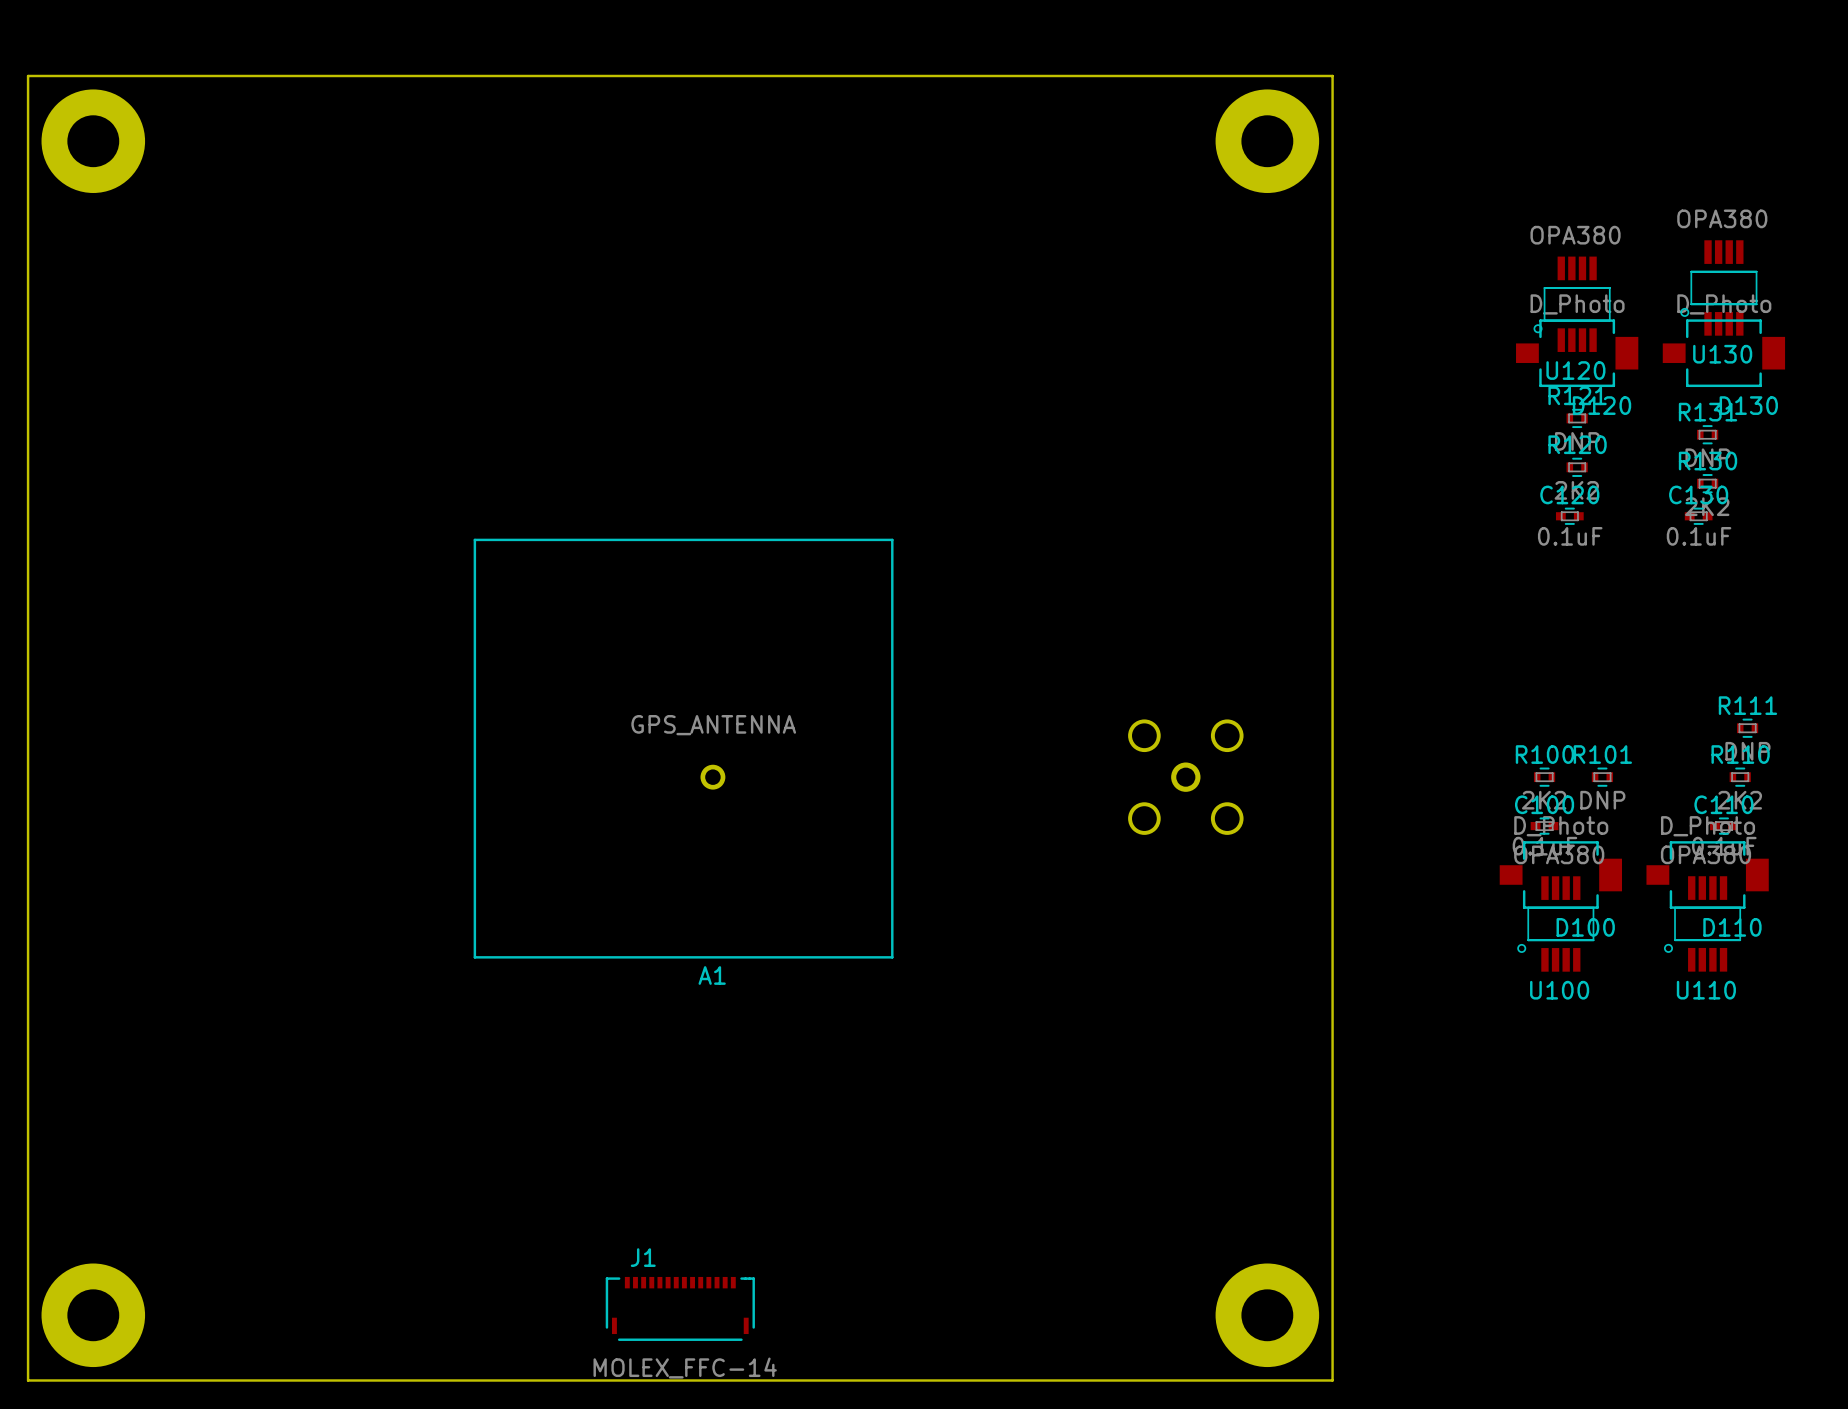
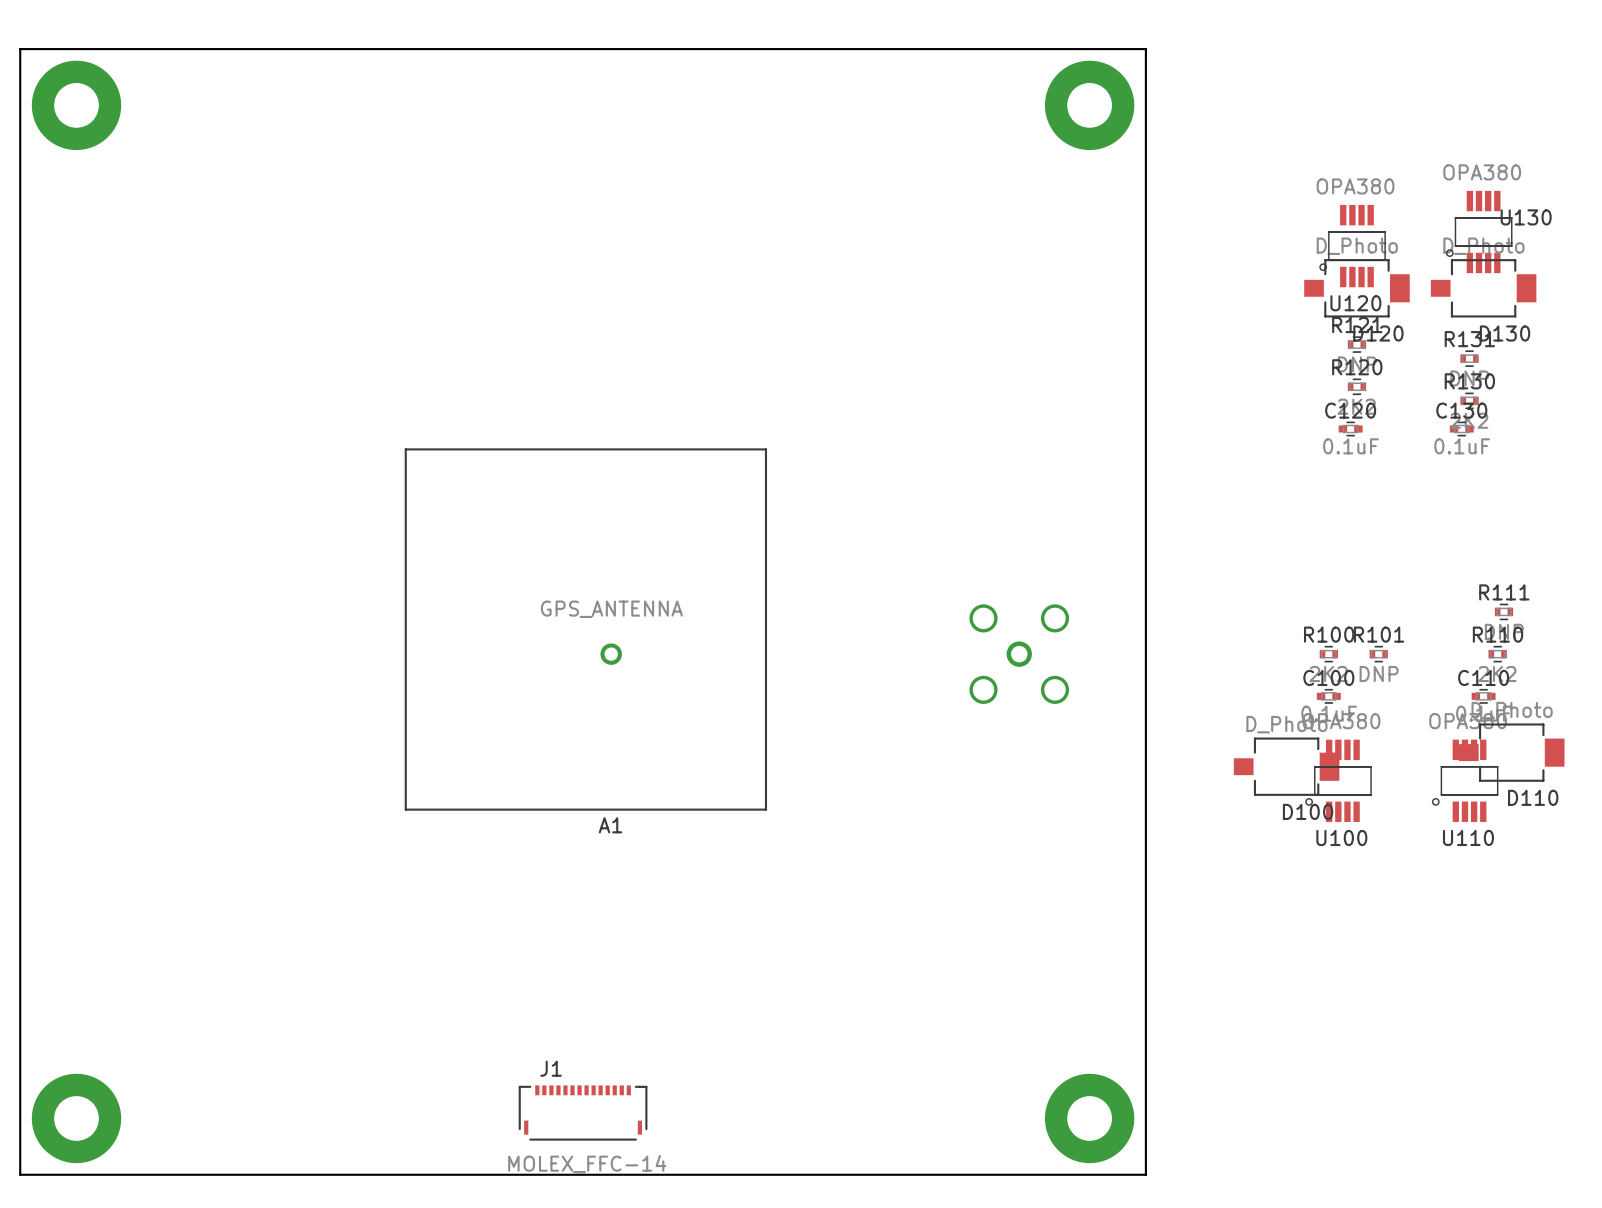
U130 name position: U130 (1722, 354) -> U130 (1526, 217)
D100 position: (1560, 875) -> (1286, 766)
D110 position: (1707, 875) -> (1511, 752)

